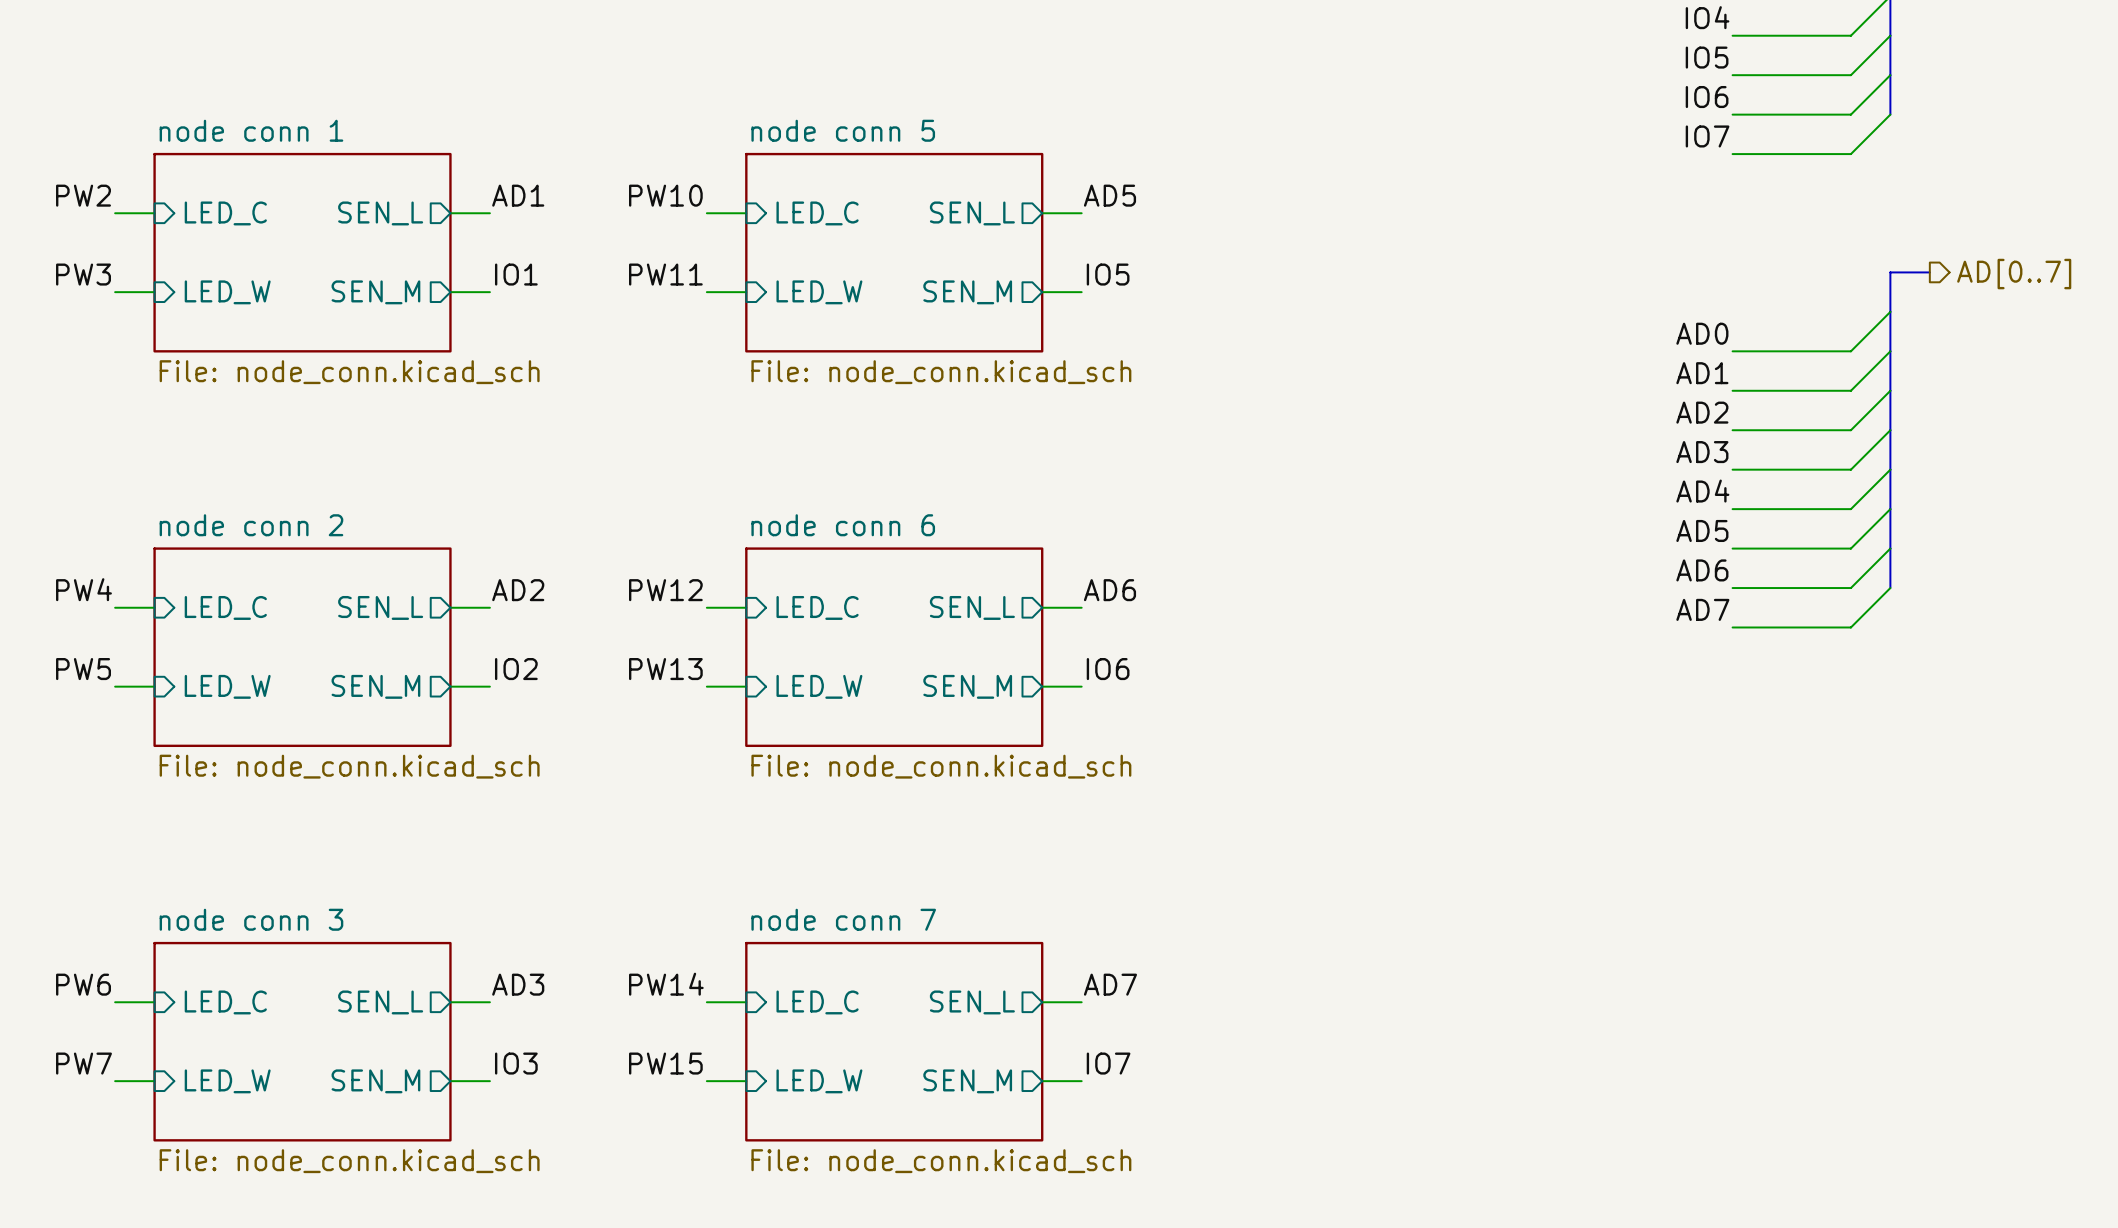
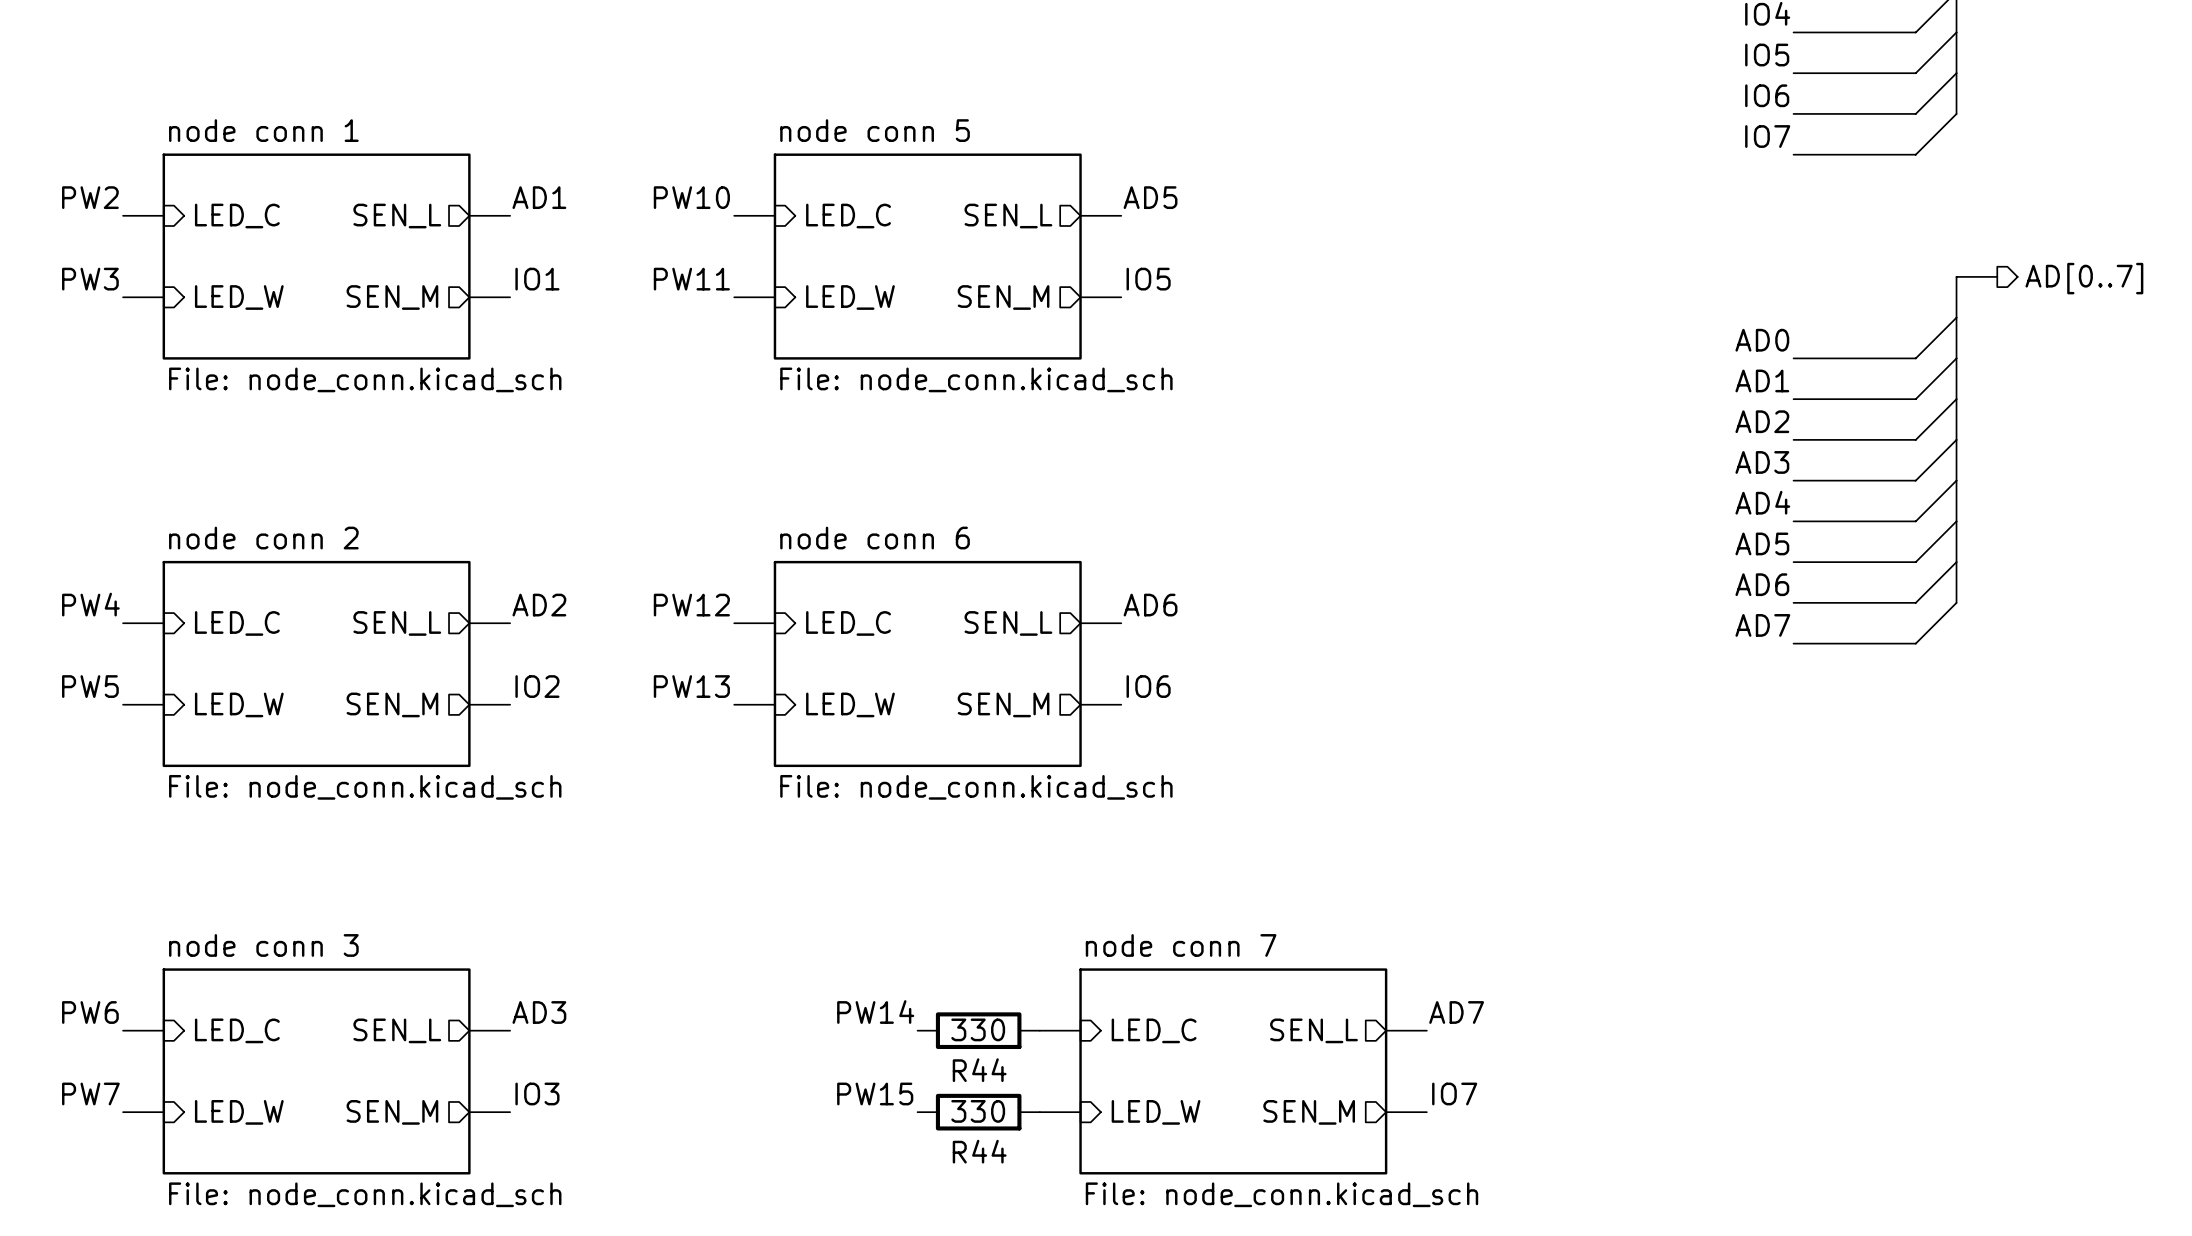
label position: PW14 (666, 984) -> PW14 (875, 1012)
label position: AD7 (1110, 984) -> AD7 (1456, 1012)
wire: (706, 1002) (746, 1002) -> none
sheet pin position: LED_C (817, 1002) -> LED_C (1154, 1030)
R44: none -> 330 (978, 1030)
sheet pin position: SEN_L (972, 1002) -> SEN_L (1314, 1030)
wire: (1042, 1002) (1081, 1002) -> (1080, 1030) (1039, 1030)
wire: none -> (1386, 1030) (1426, 1030)
sheet node conn 7 position: (894, 1041) -> (1233, 1071)
label position: PW15 (665, 1063) -> PW15 (875, 1093)
label position: IO7 (1108, 1063) -> IO7 (1454, 1093)
wire: (706, 1081) (746, 1081) -> none
sheet pin position: LED_W (819, 1081) -> LED_W (1156, 1112)
R44: none -> 330 (978, 1112)
sheet pin position: SEN_M (967, 1081) -> SEN_M (1309, 1112)
wire: (1042, 1081) (1081, 1081) -> (1080, 1112) (1039, 1112)
wire: none -> (1386, 1112) (1426, 1112)

